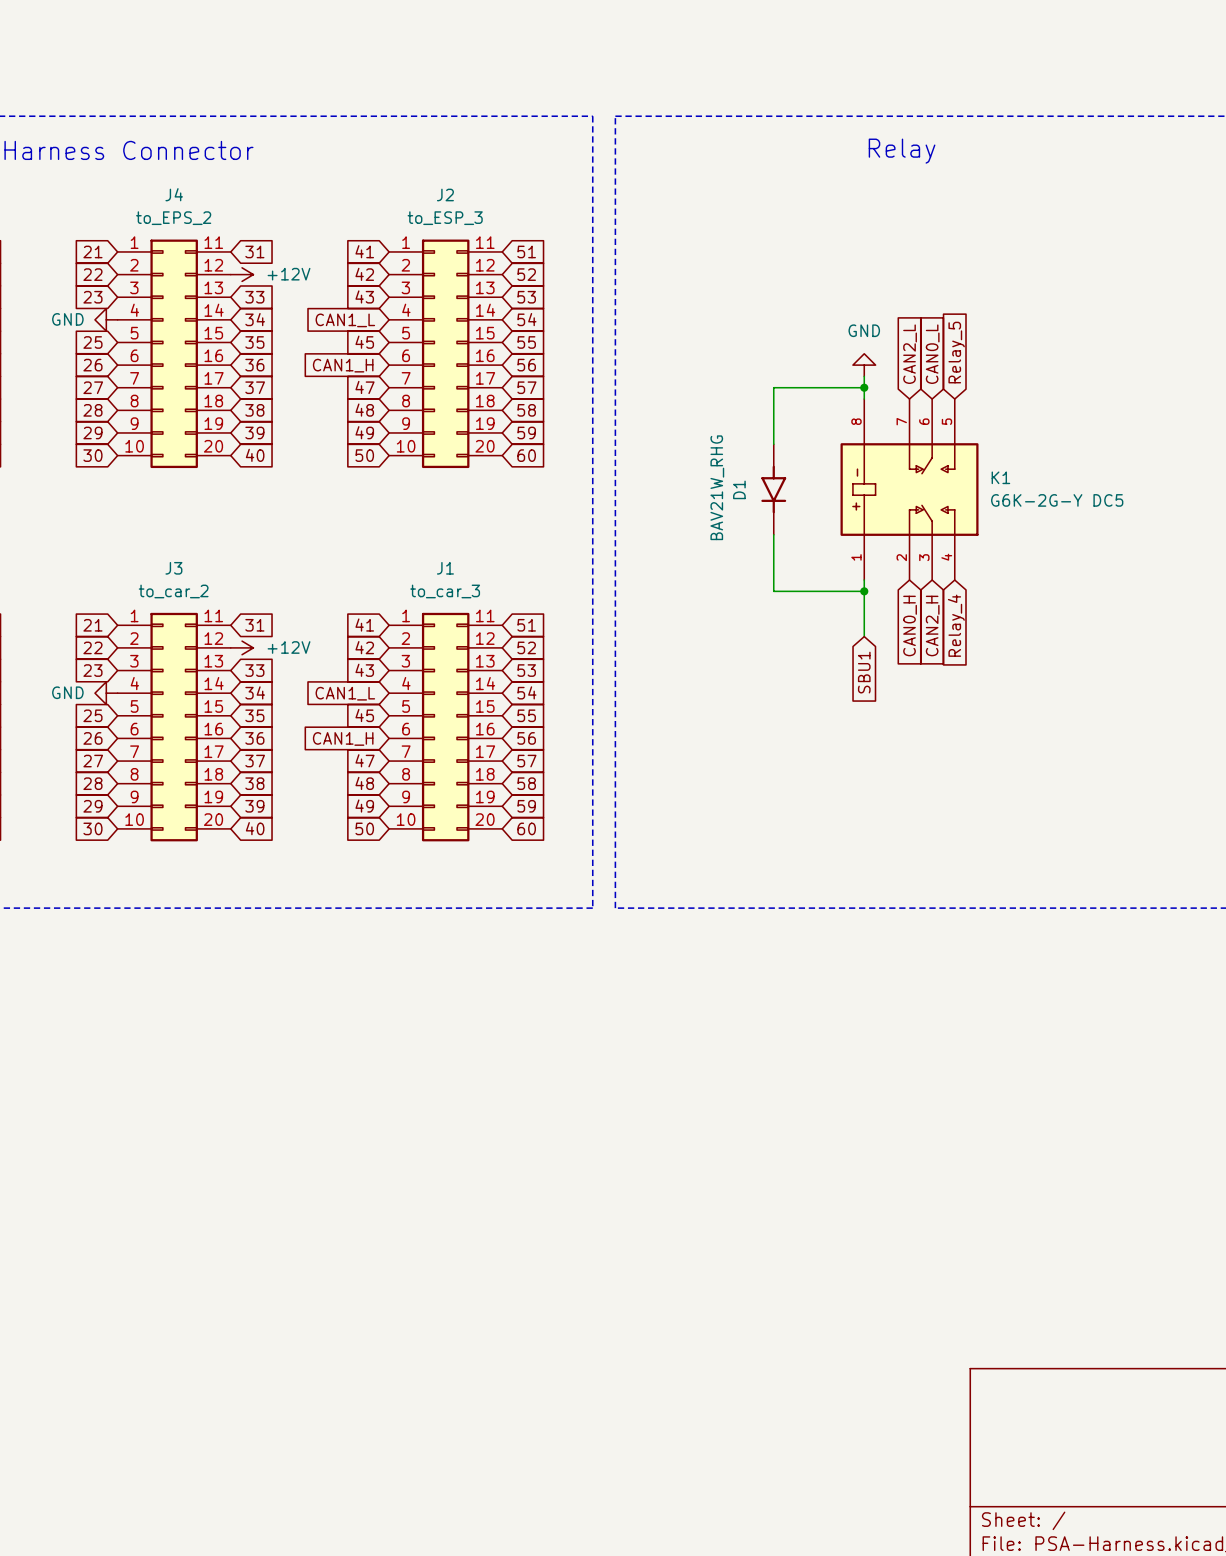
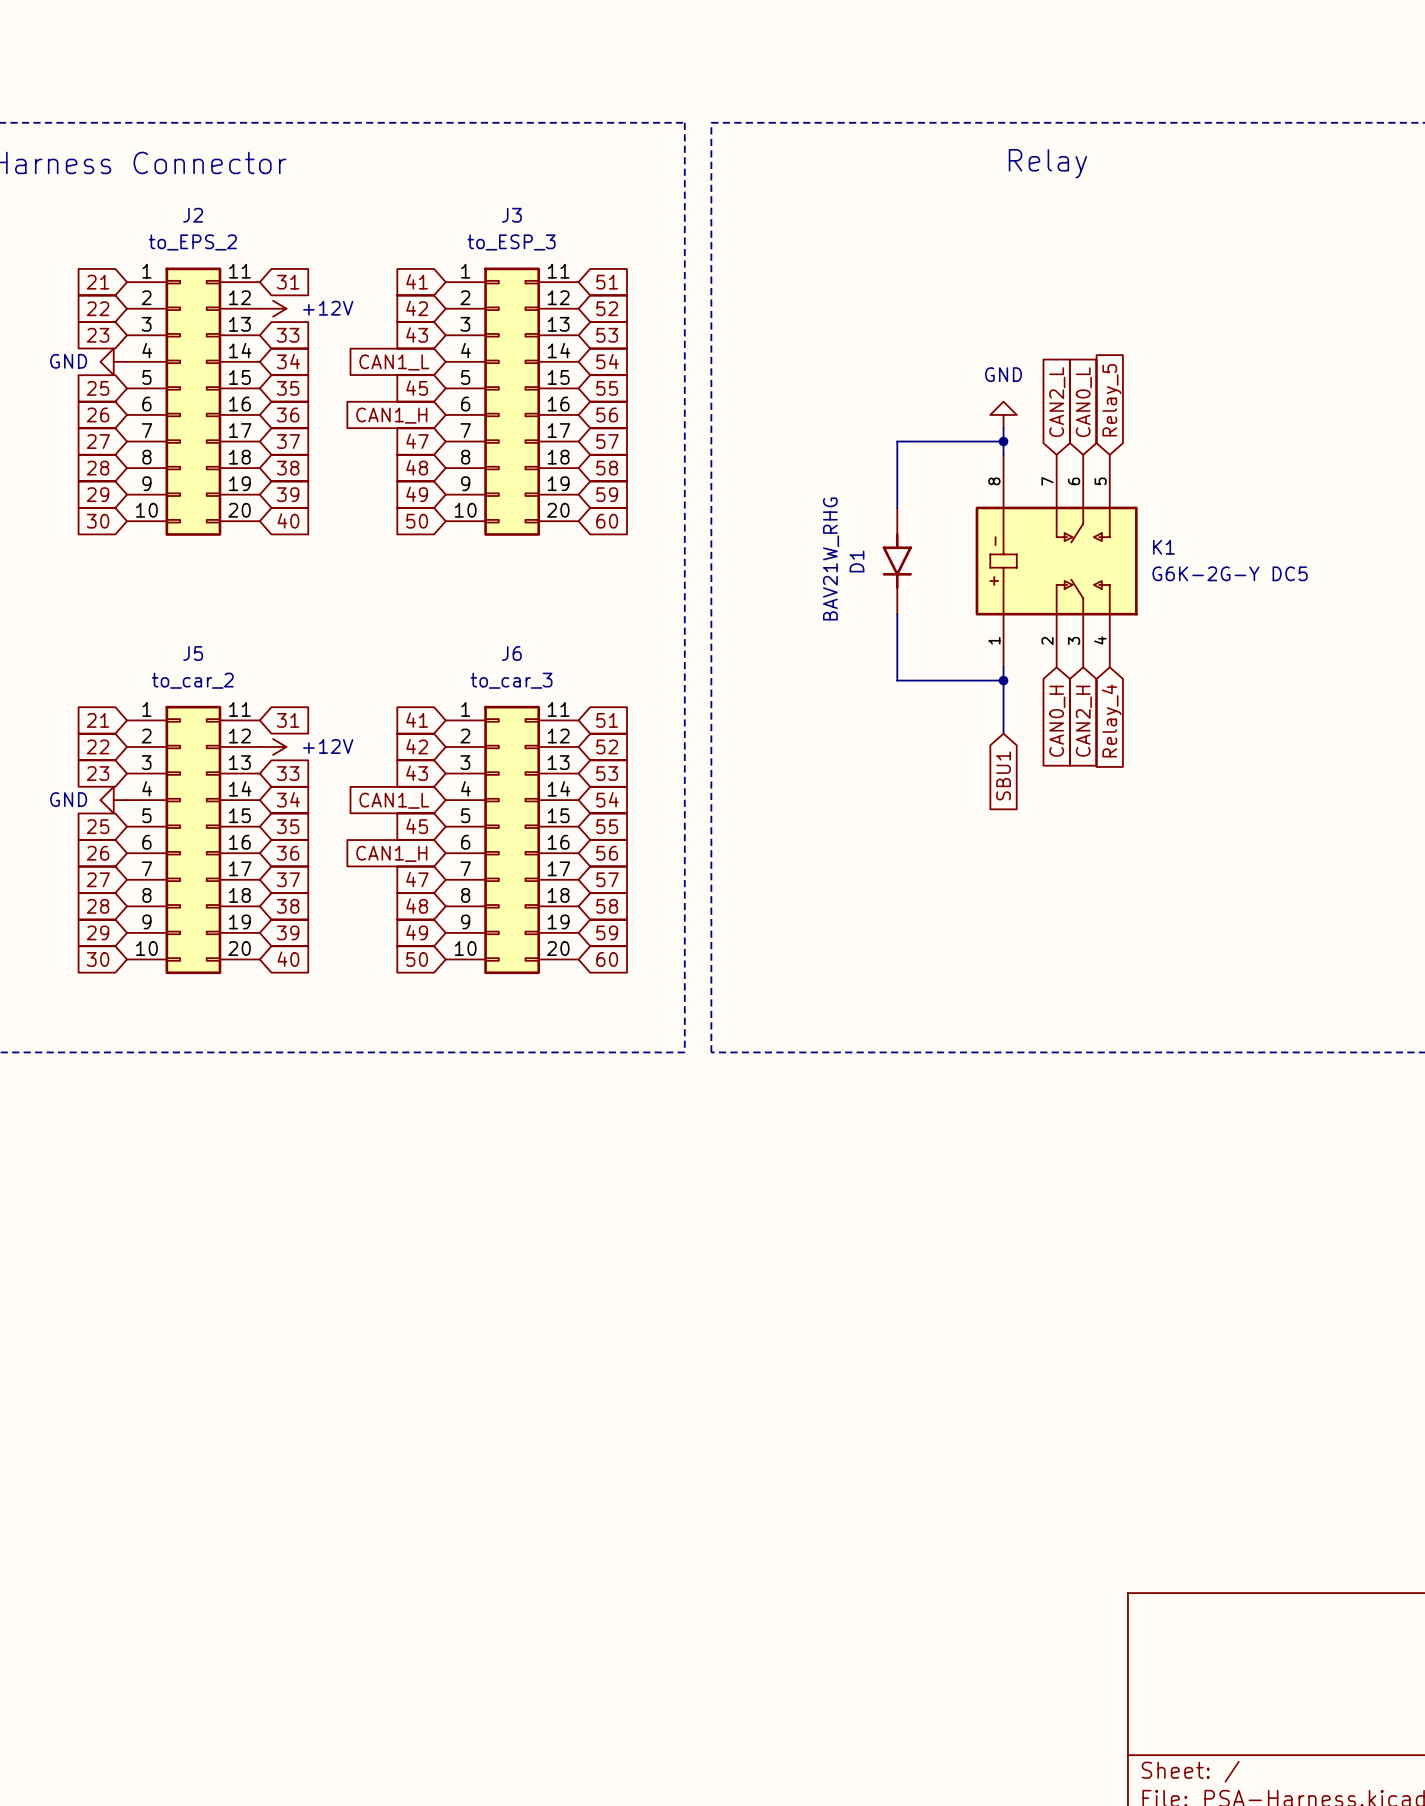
J4 name: J4 (174, 194) -> J2 (193, 215)
J2 name: J2 (445, 194) -> J3 (511, 215)
J3 name: J3 (173, 568) -> J5 (193, 653)
J1 name: J1 (445, 568) -> J6 (511, 653)

